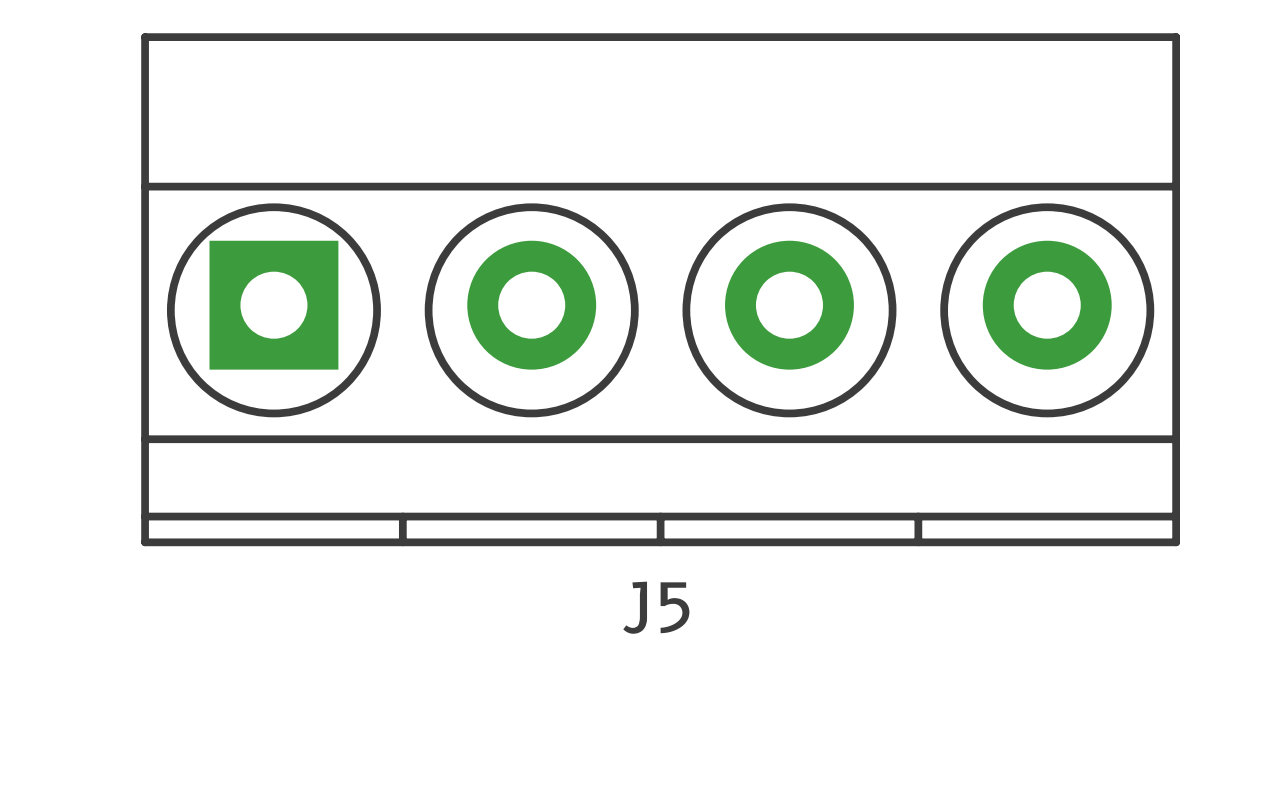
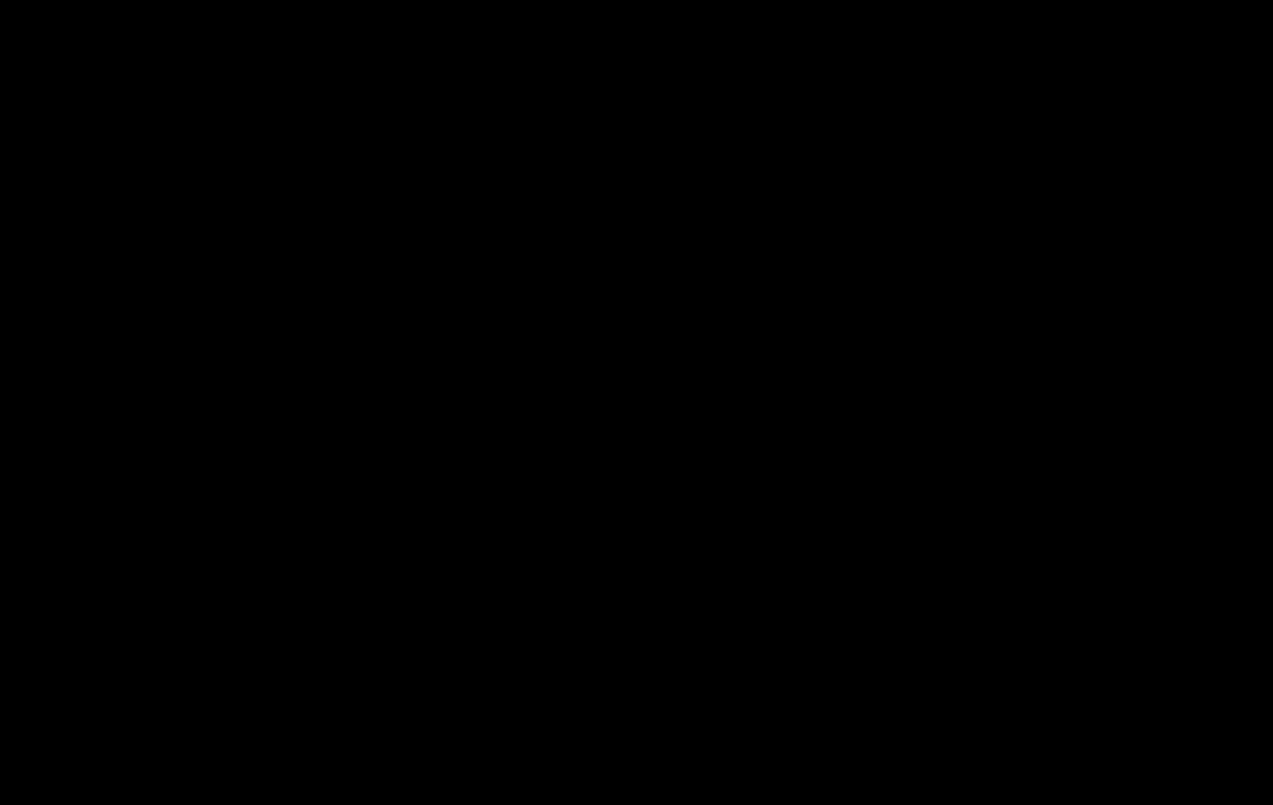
J5: (660, 289) -> none

